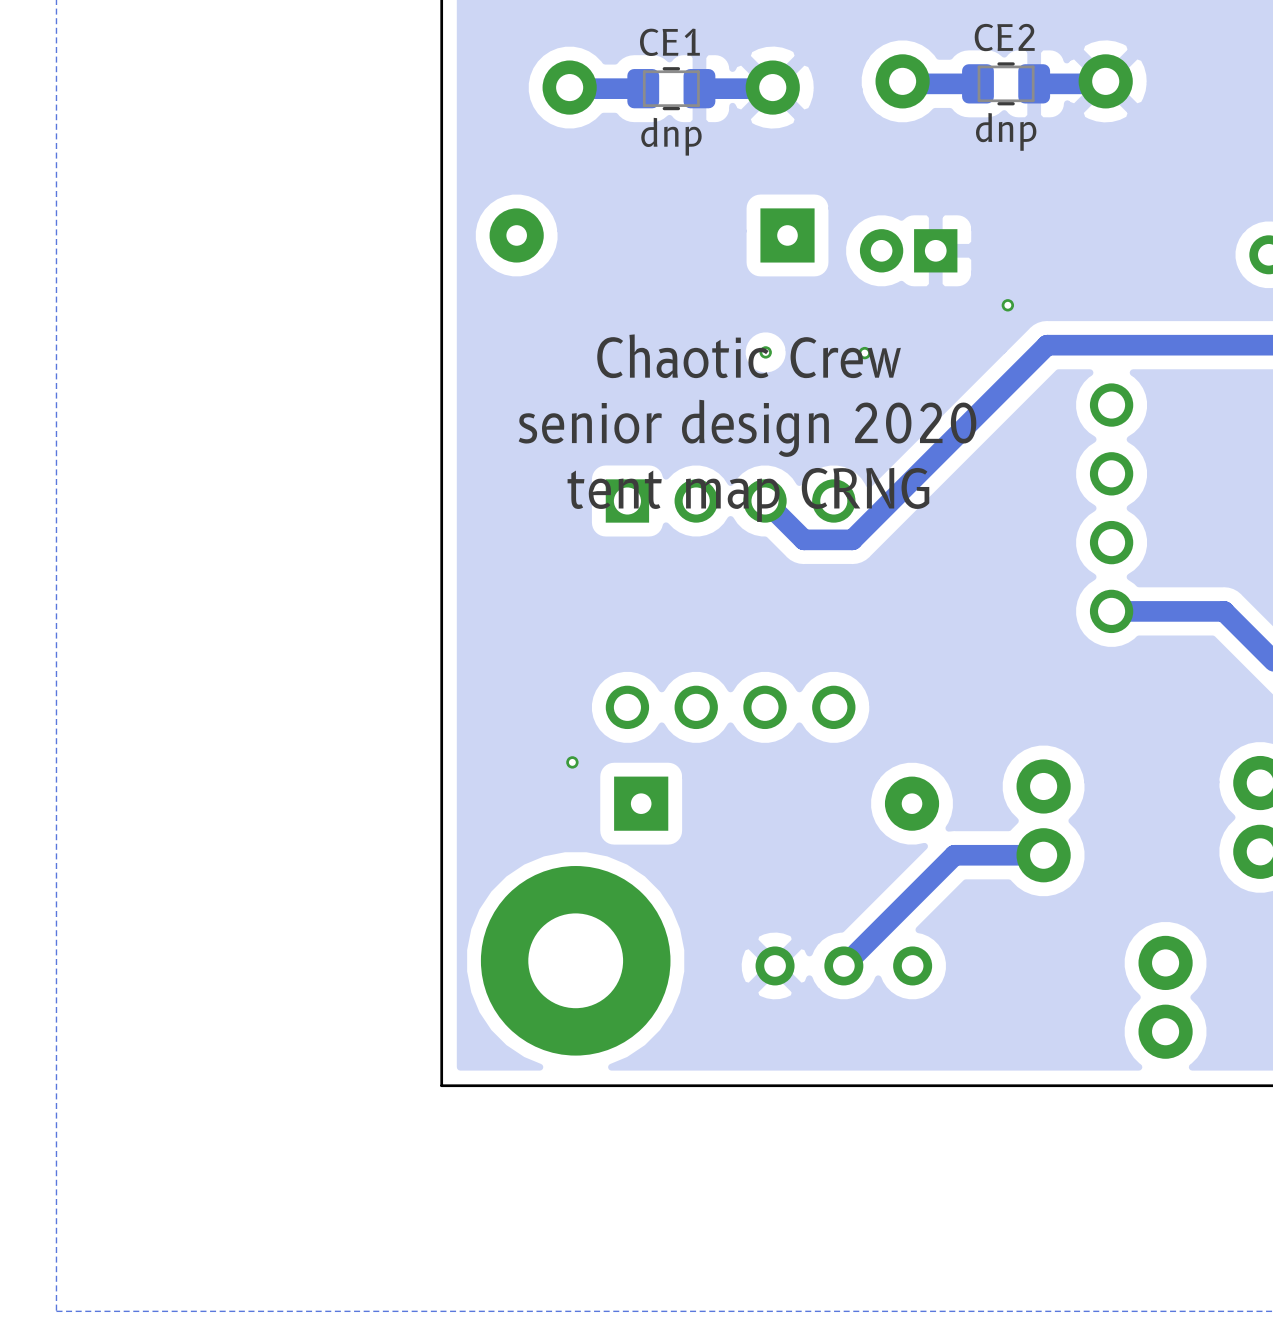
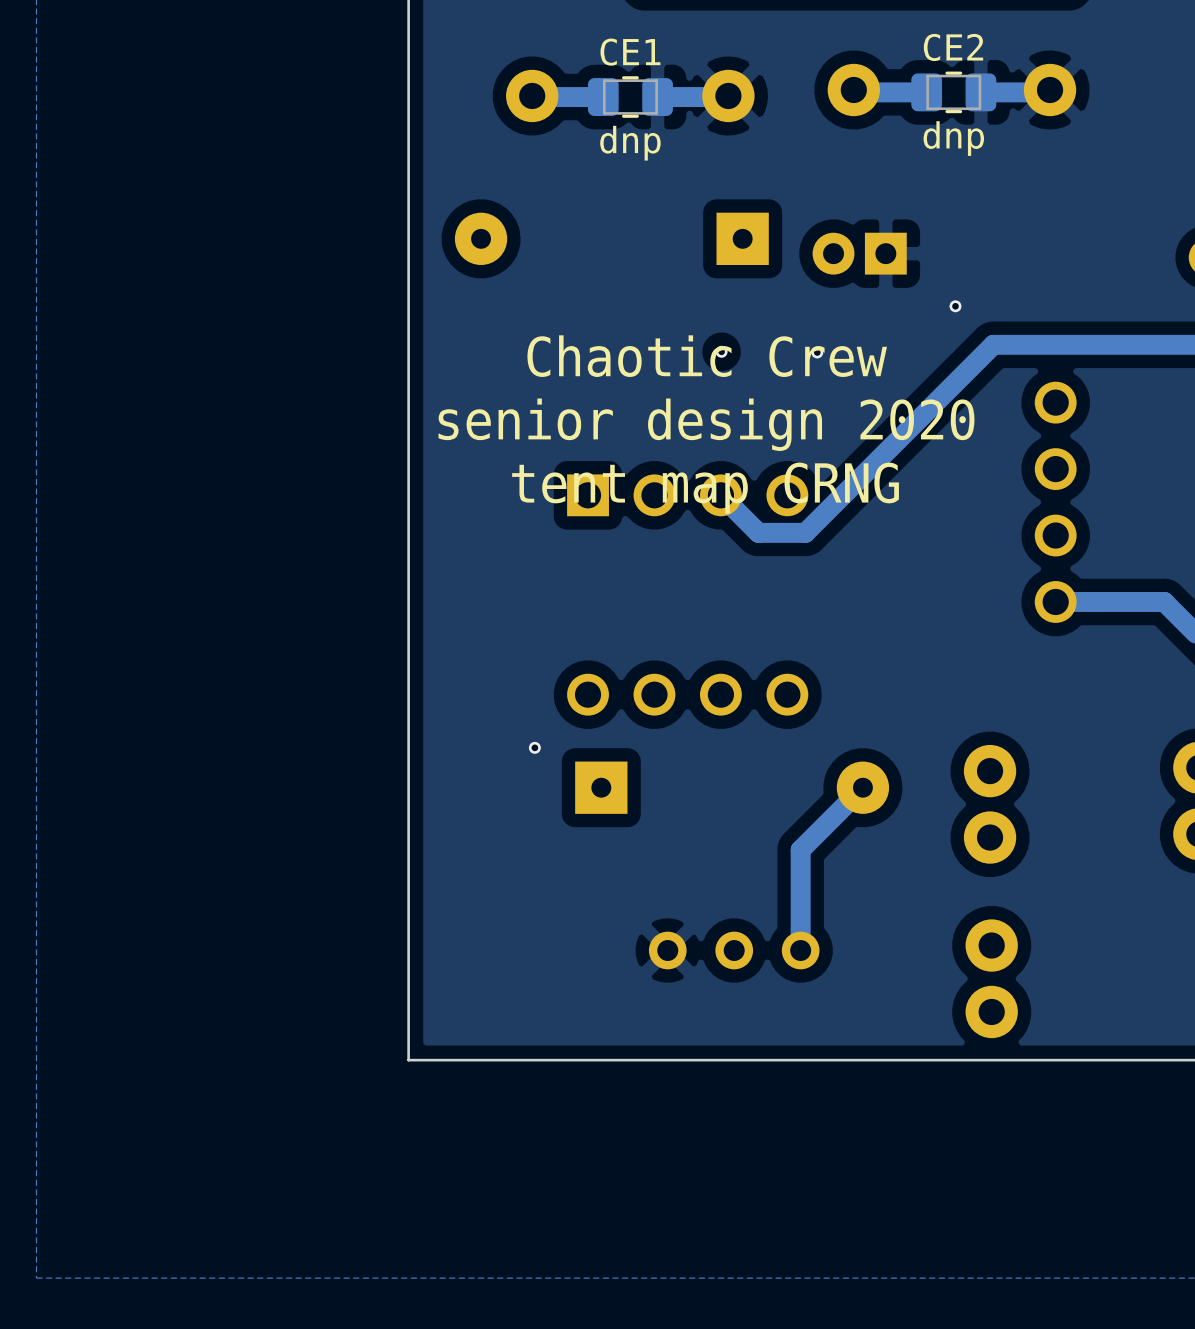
track: none -> (862, 787) (800, 849) (800, 950)
track: (1043, 855) (954, 855) (843, 965) -> none
part: (575, 960) -> none
part position: (843, 965) -> (734, 950)
part position: (1165, 997) -> (991, 978)

